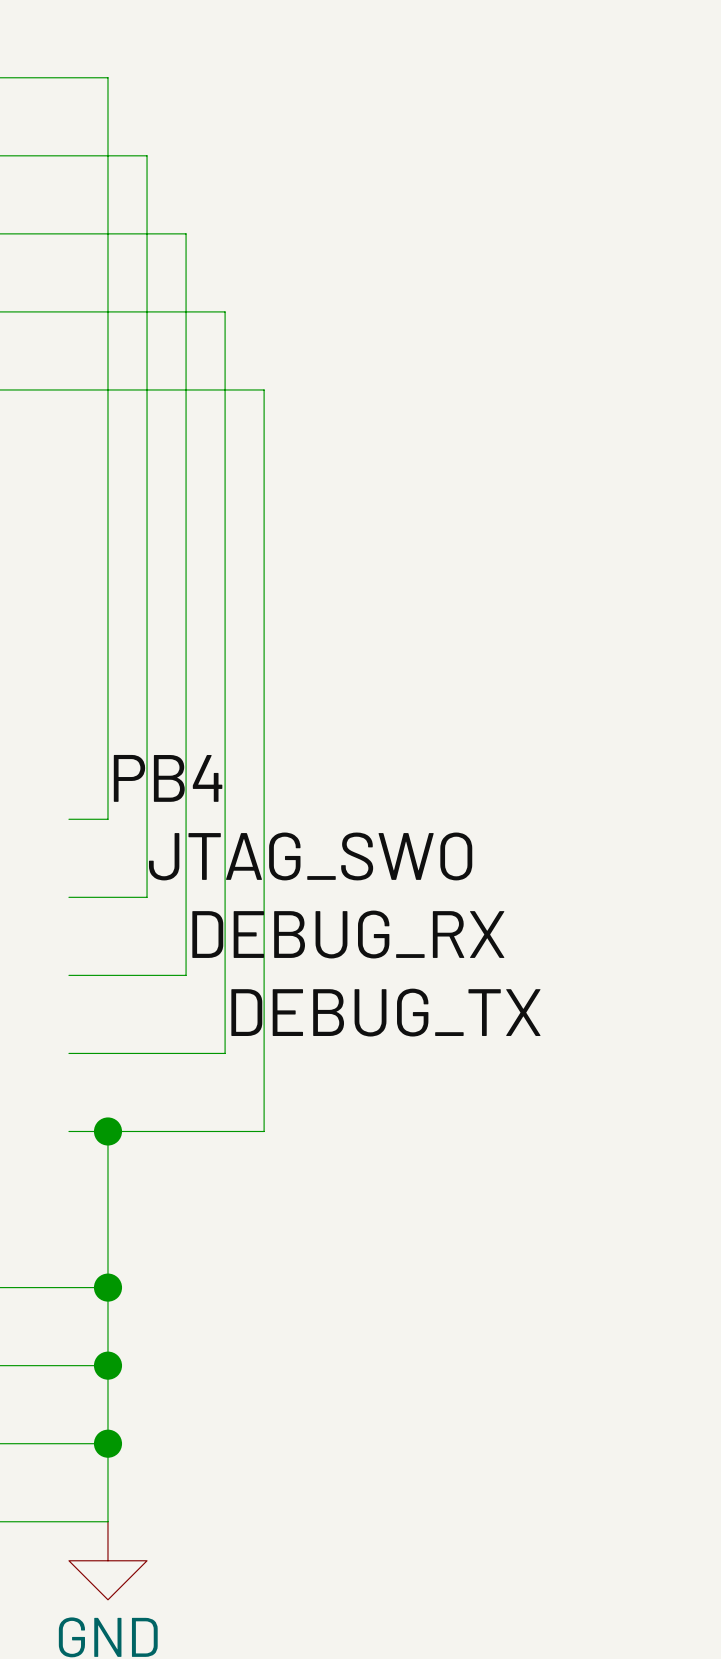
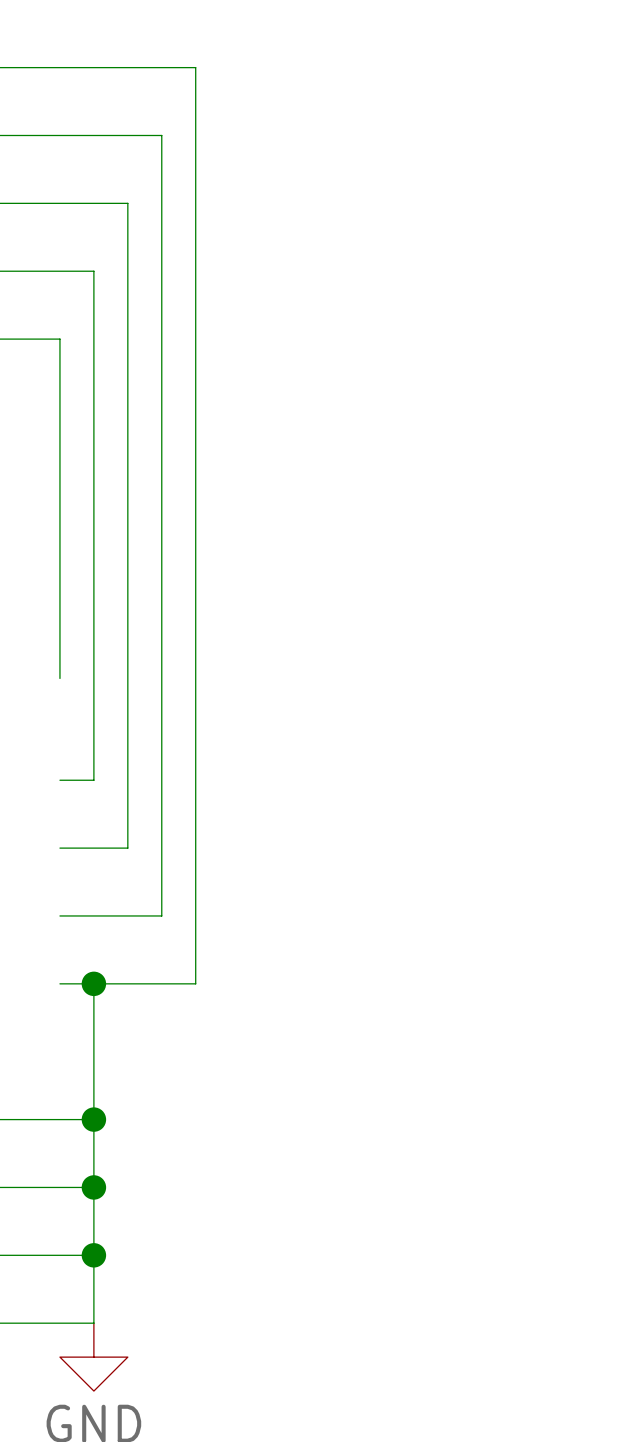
wire: (107, 77) (107, 311) (225, 311) -> (93, 67) (195, 67) (195, 271)
wire: (147, 155) (147, 233) (186, 233) -> (127, 135) (161, 135) (161, 203)
wire: (68, 389) (264, 389) (264, 1131) (225, 1131) -> (59, 339) (59, 678)
label: PB4 (168, 778) -> none
wire: (68, 819) (107, 819) -> (93, 780) (93, 712)
label: JTAG_SWO (310, 856) -> none
wire: (107, 897) (147, 897) -> none
label: DEBUG_RX (348, 934) -> none
wire: (147, 975) (186, 975) -> (127, 848) (127, 780)
wire: none -> (161, 848) (161, 915)
label: DEBUG_TX (385, 1012) -> none
wire: (186, 1053) (225, 1053) -> (195, 983) (195, 915)

